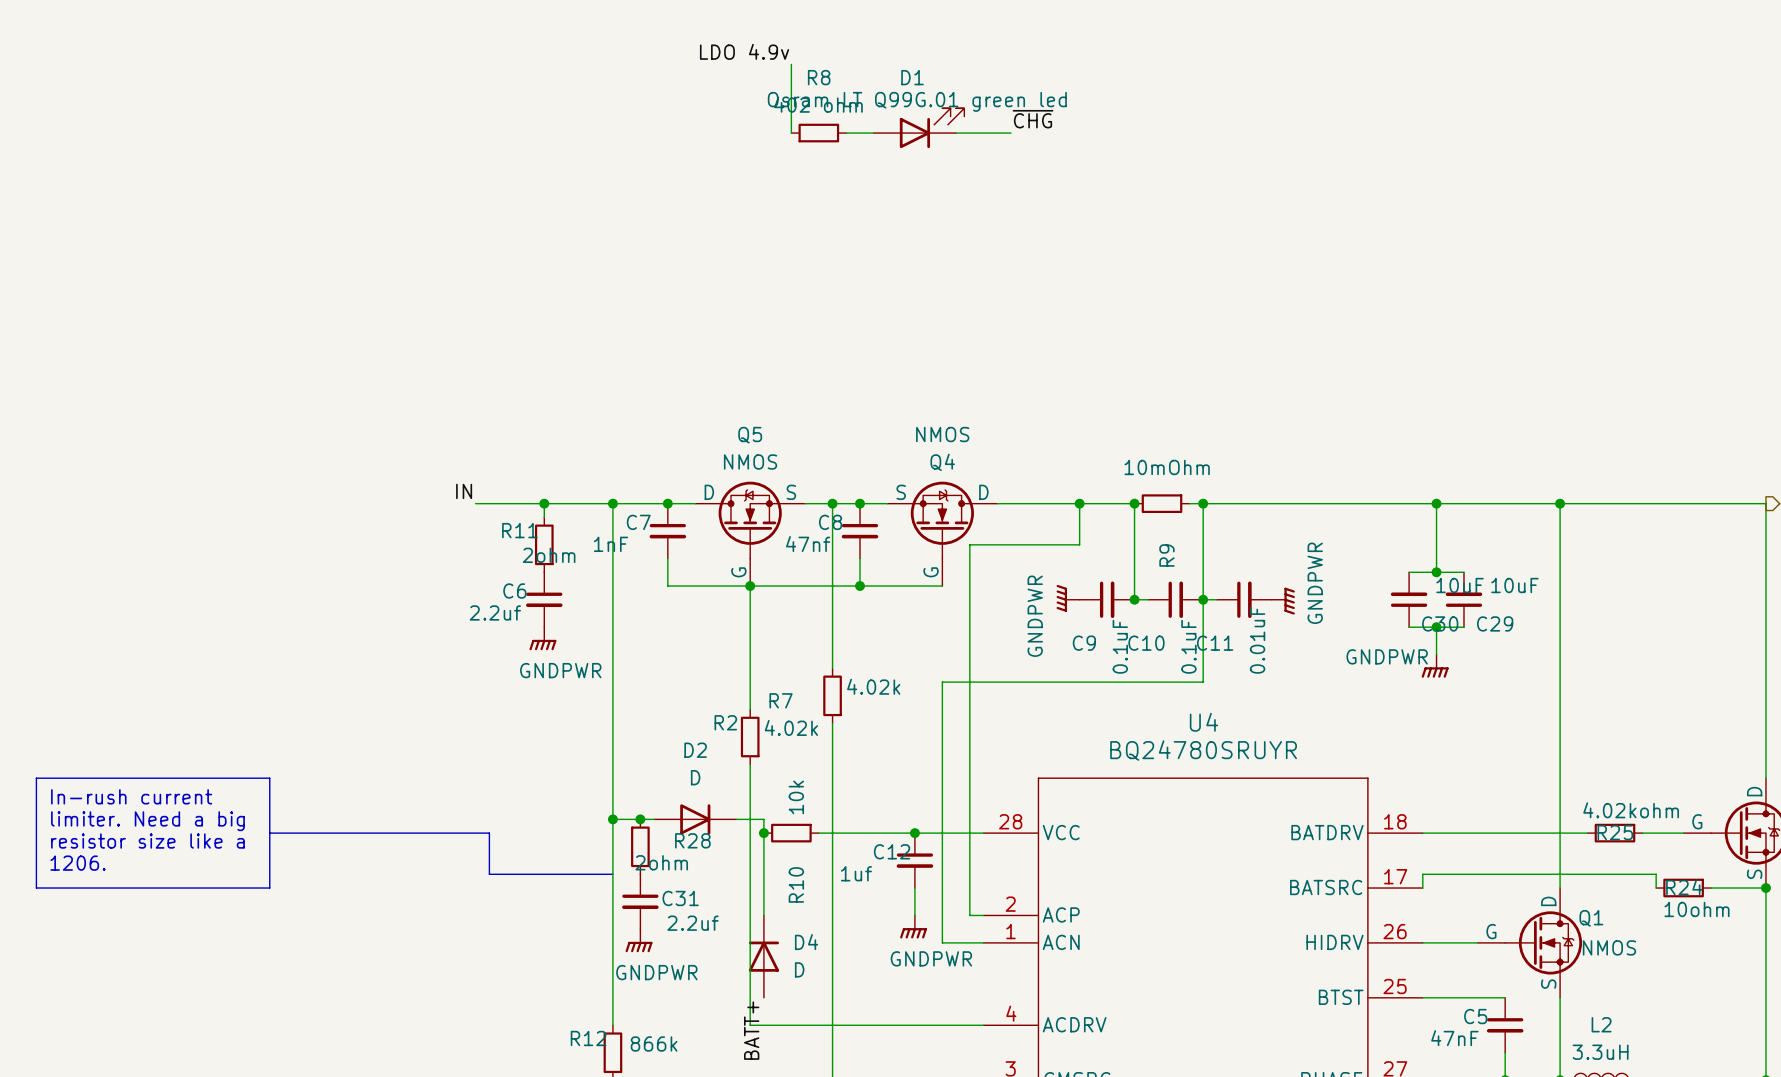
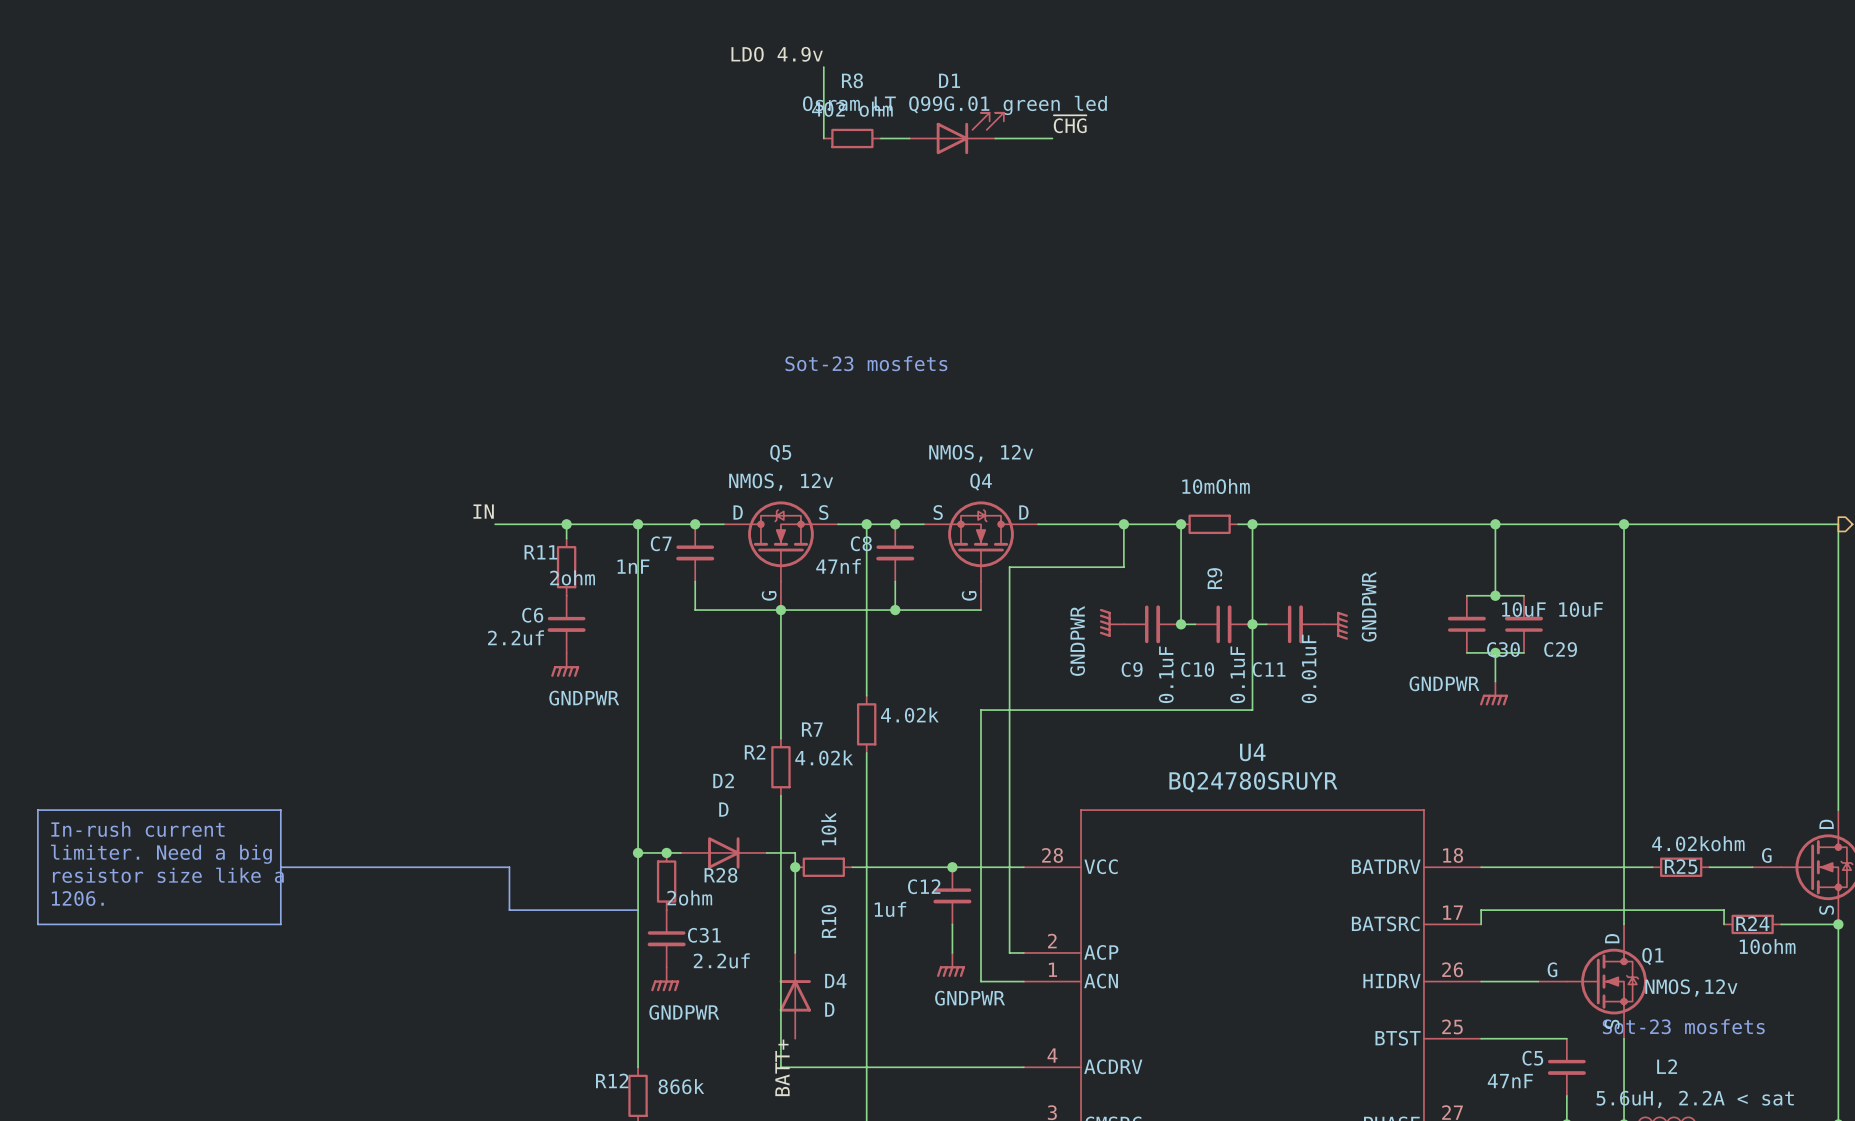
text: none -> Sot-23 mosfets (866, 363)
Q4 value: NMOS (942, 434) -> NMOS, 12v (981, 453)
Q5 value: NMOS (750, 461) -> NMOS, 12v (781, 482)
Q1 value: NMOS (1609, 947) -> NMOS,12v (1691, 987)
text: none -> Sot-23 mosfets (1683, 1026)
L2 value: 3.3uH (1600, 1052) -> 5.6uH, 2.2A < sat (1695, 1099)

